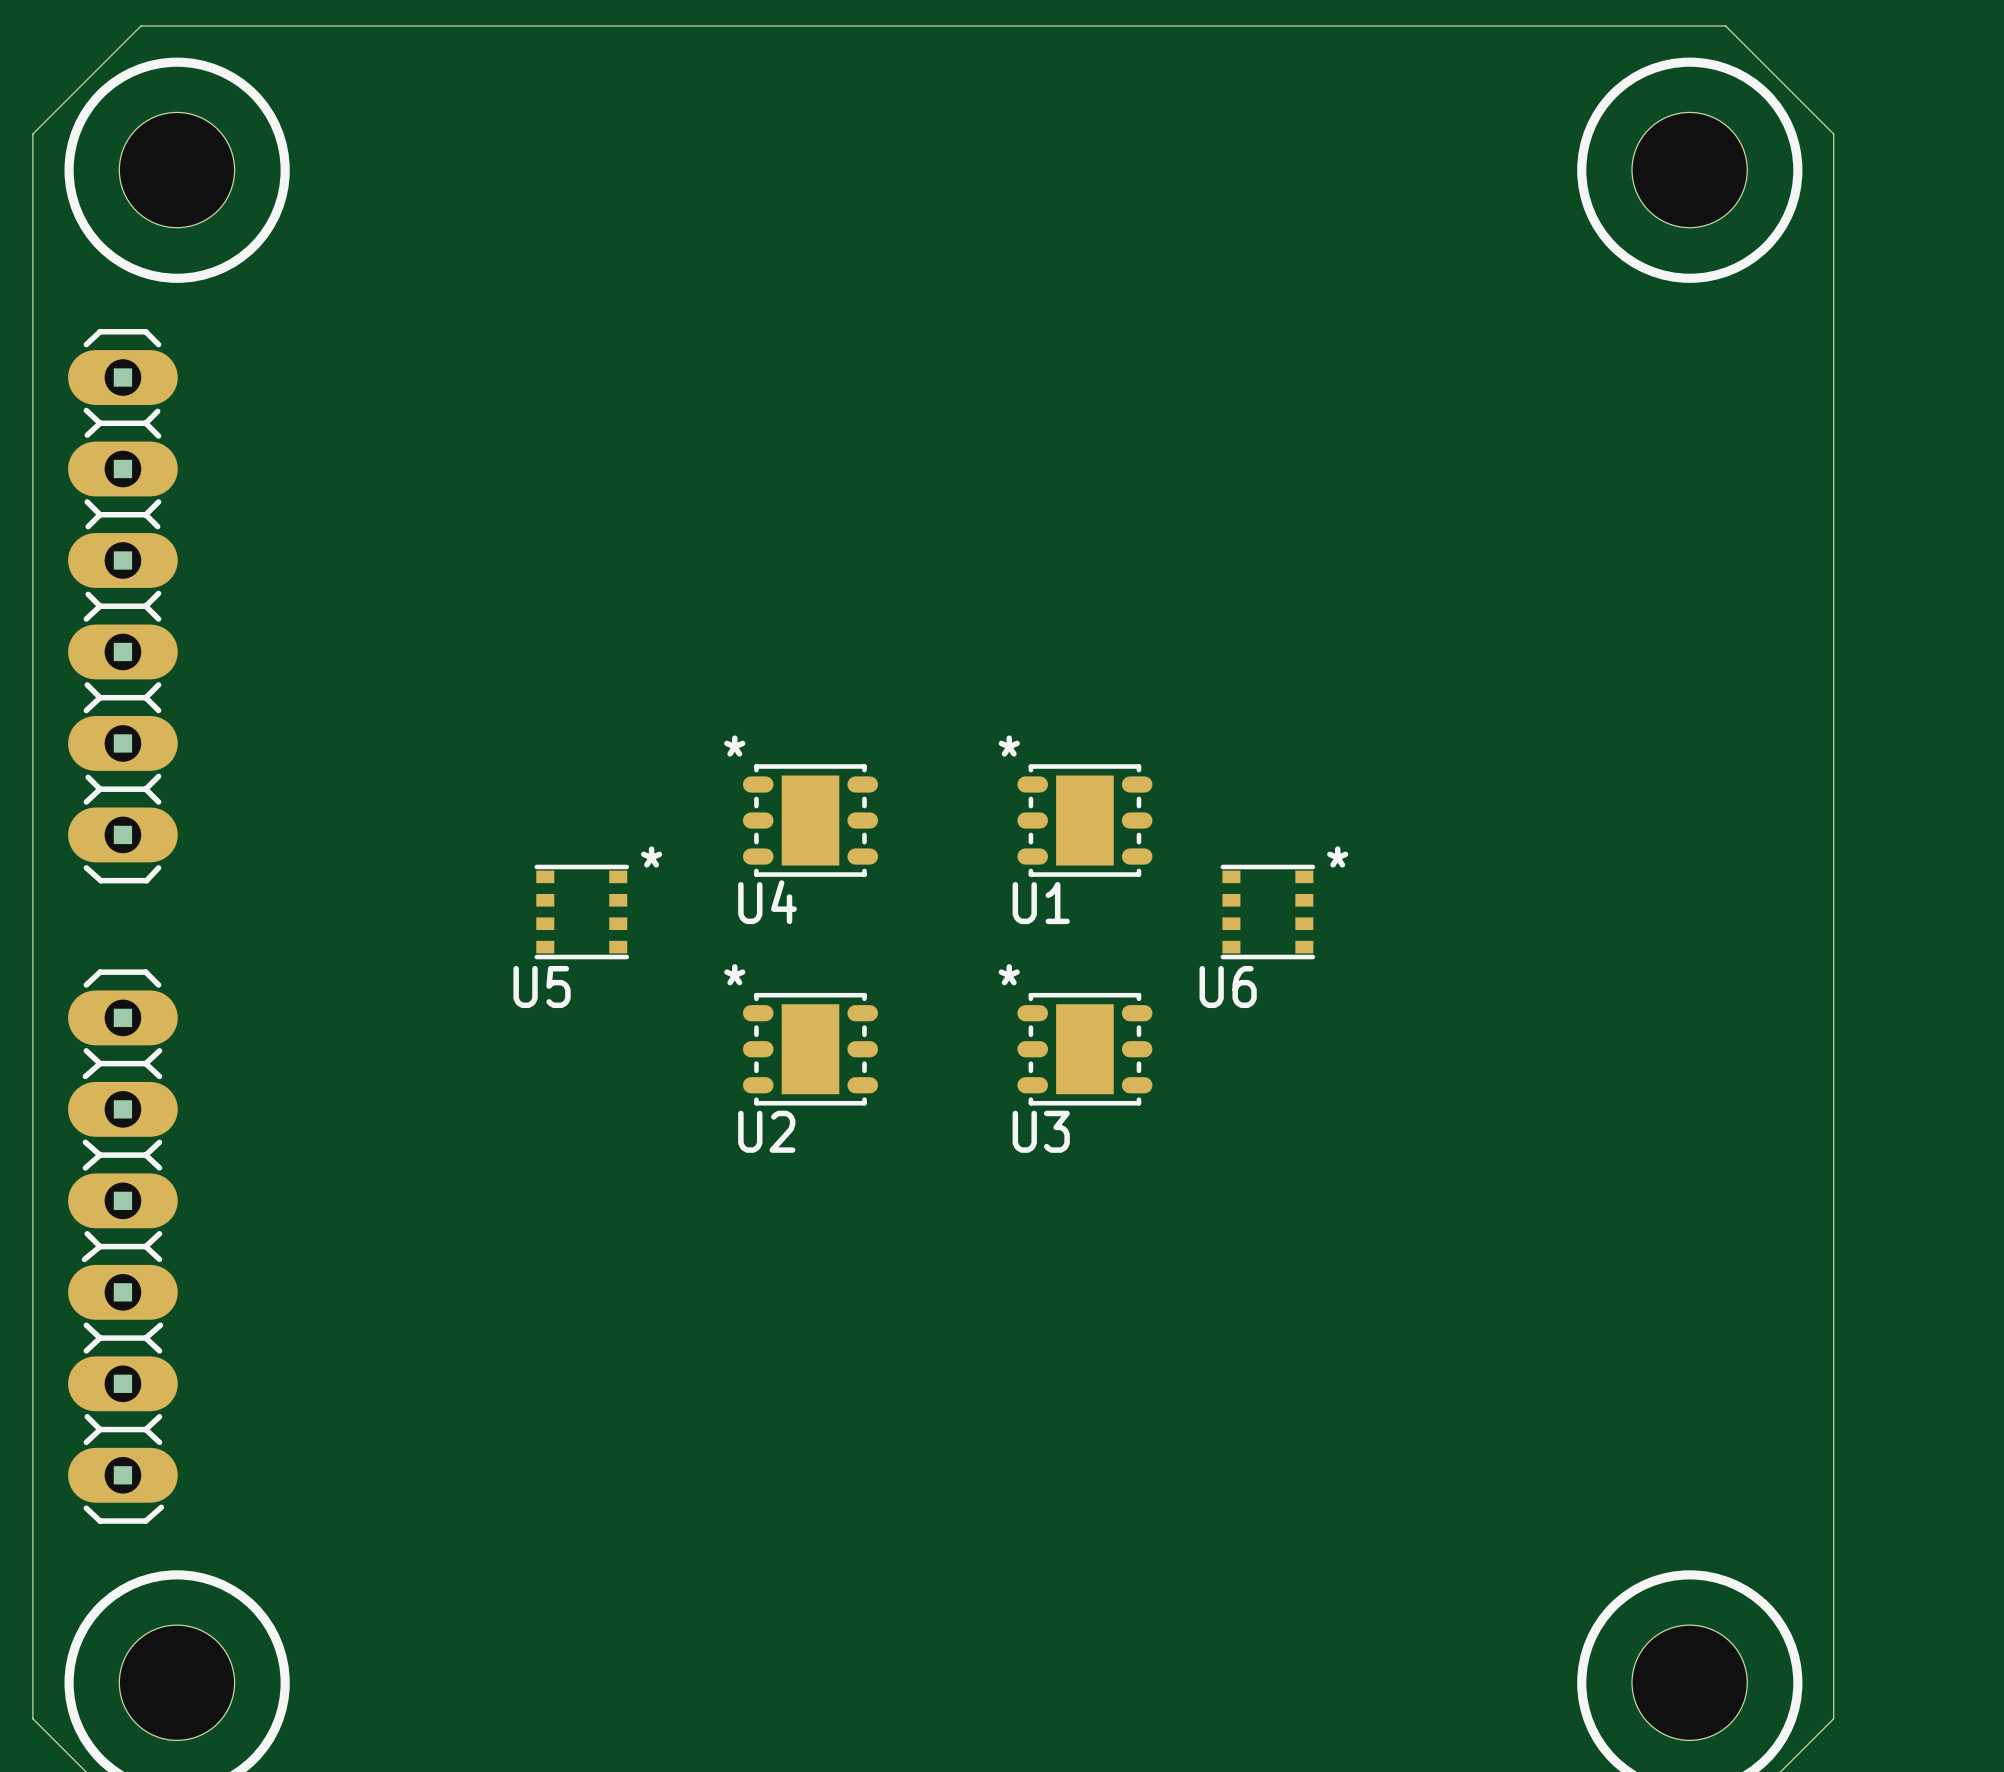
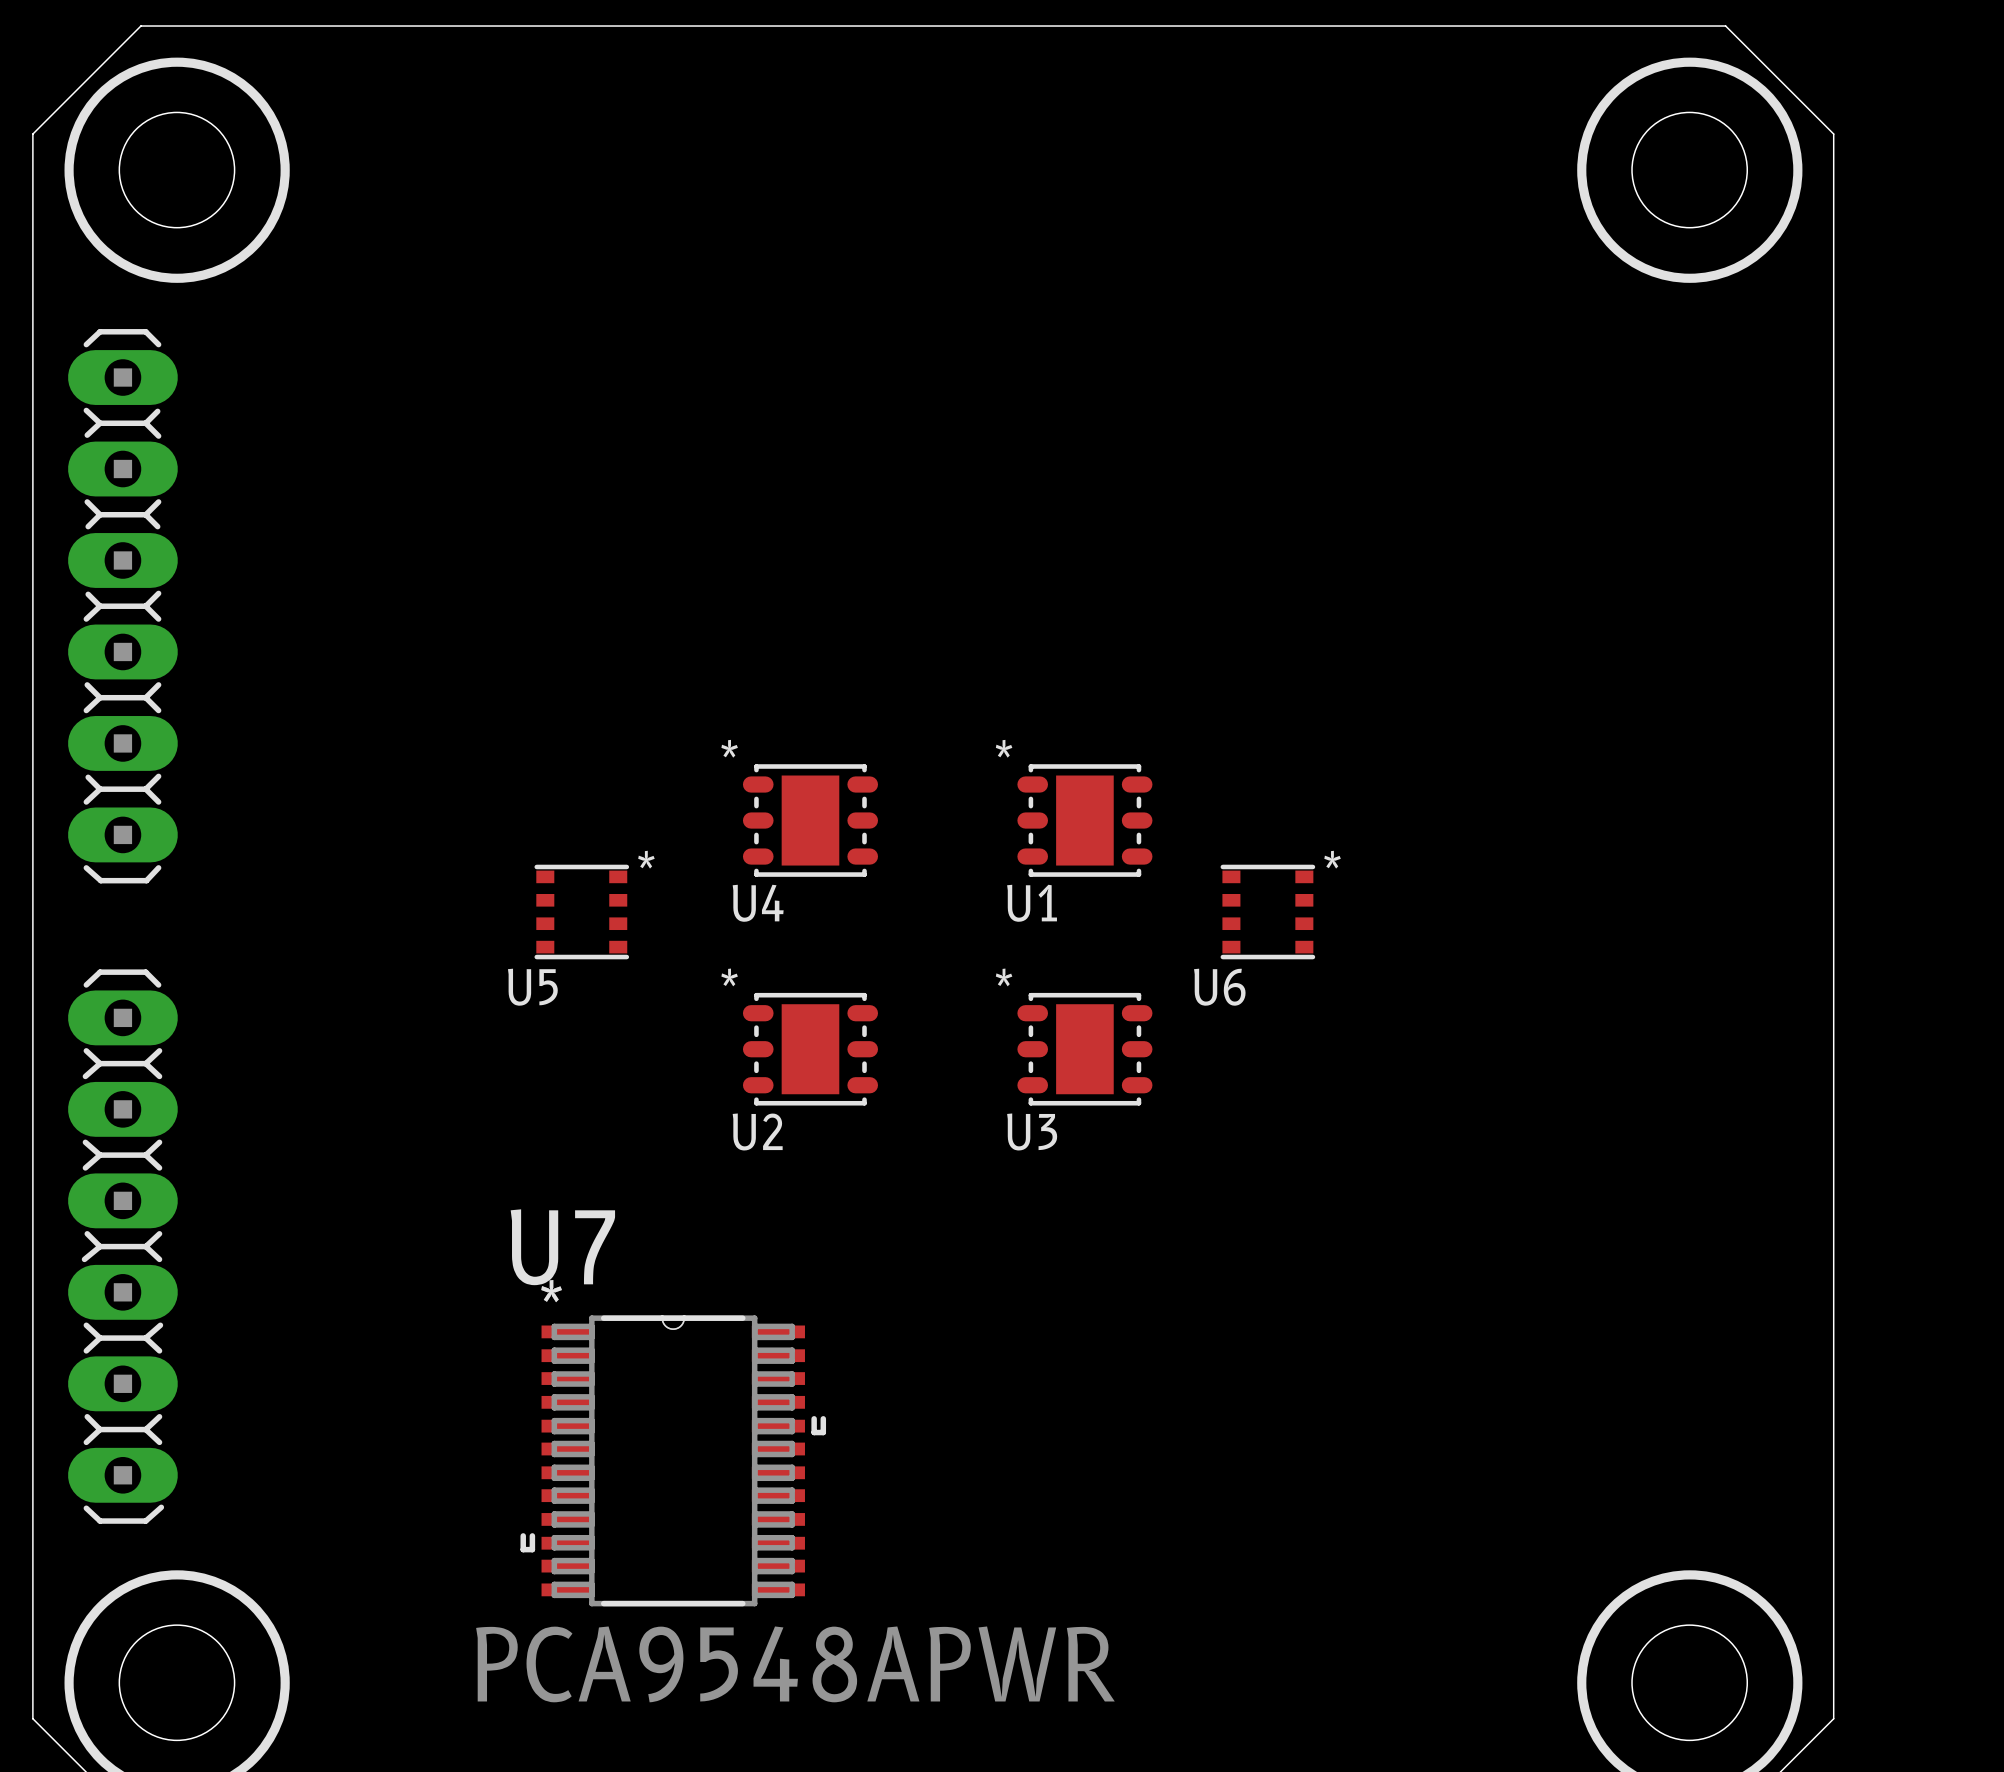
U7: none -> PCA9548APWR (673, 1460)

